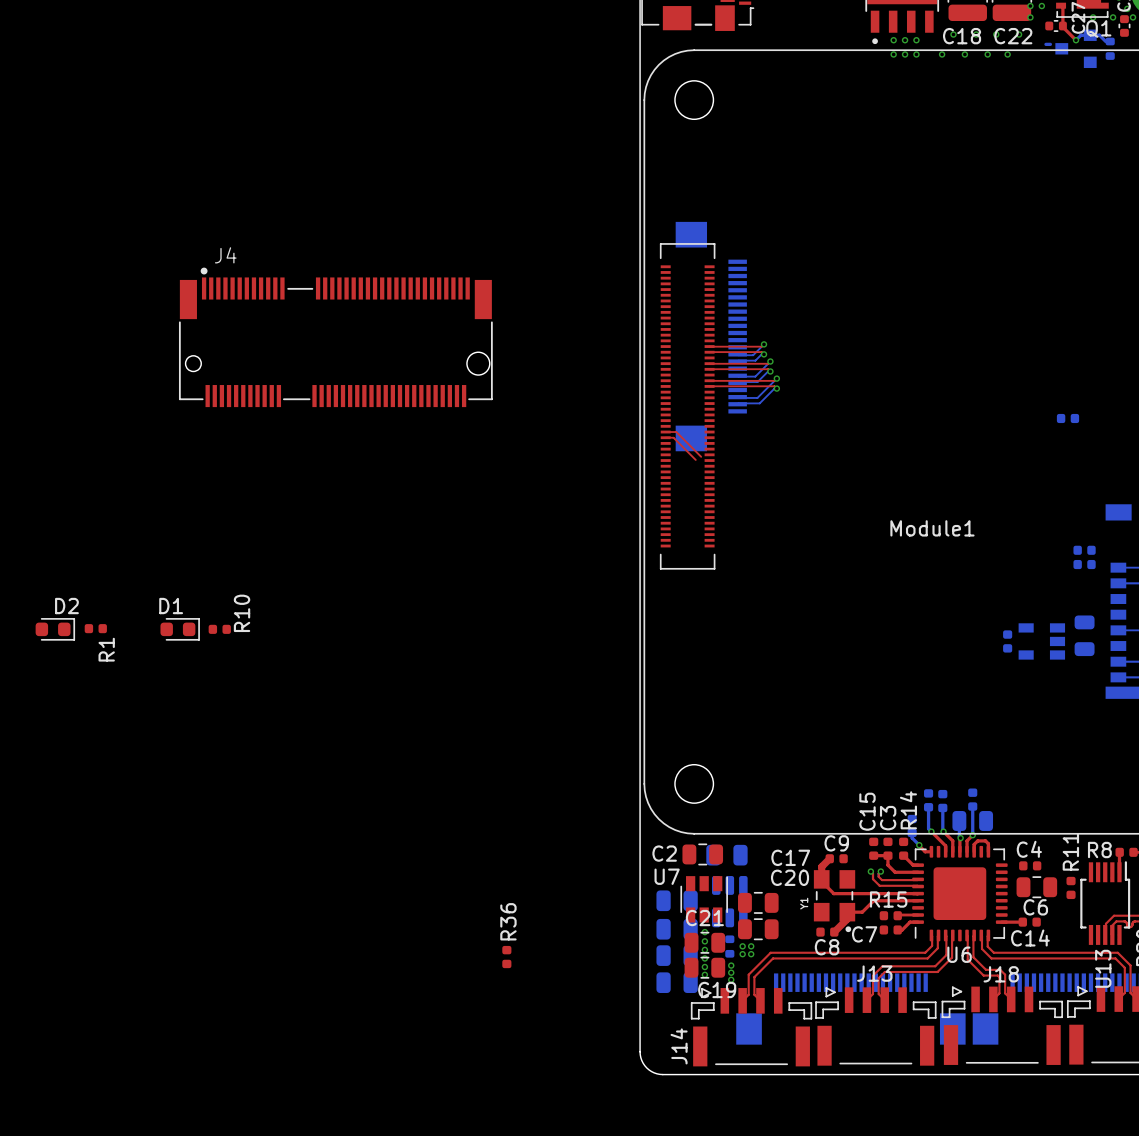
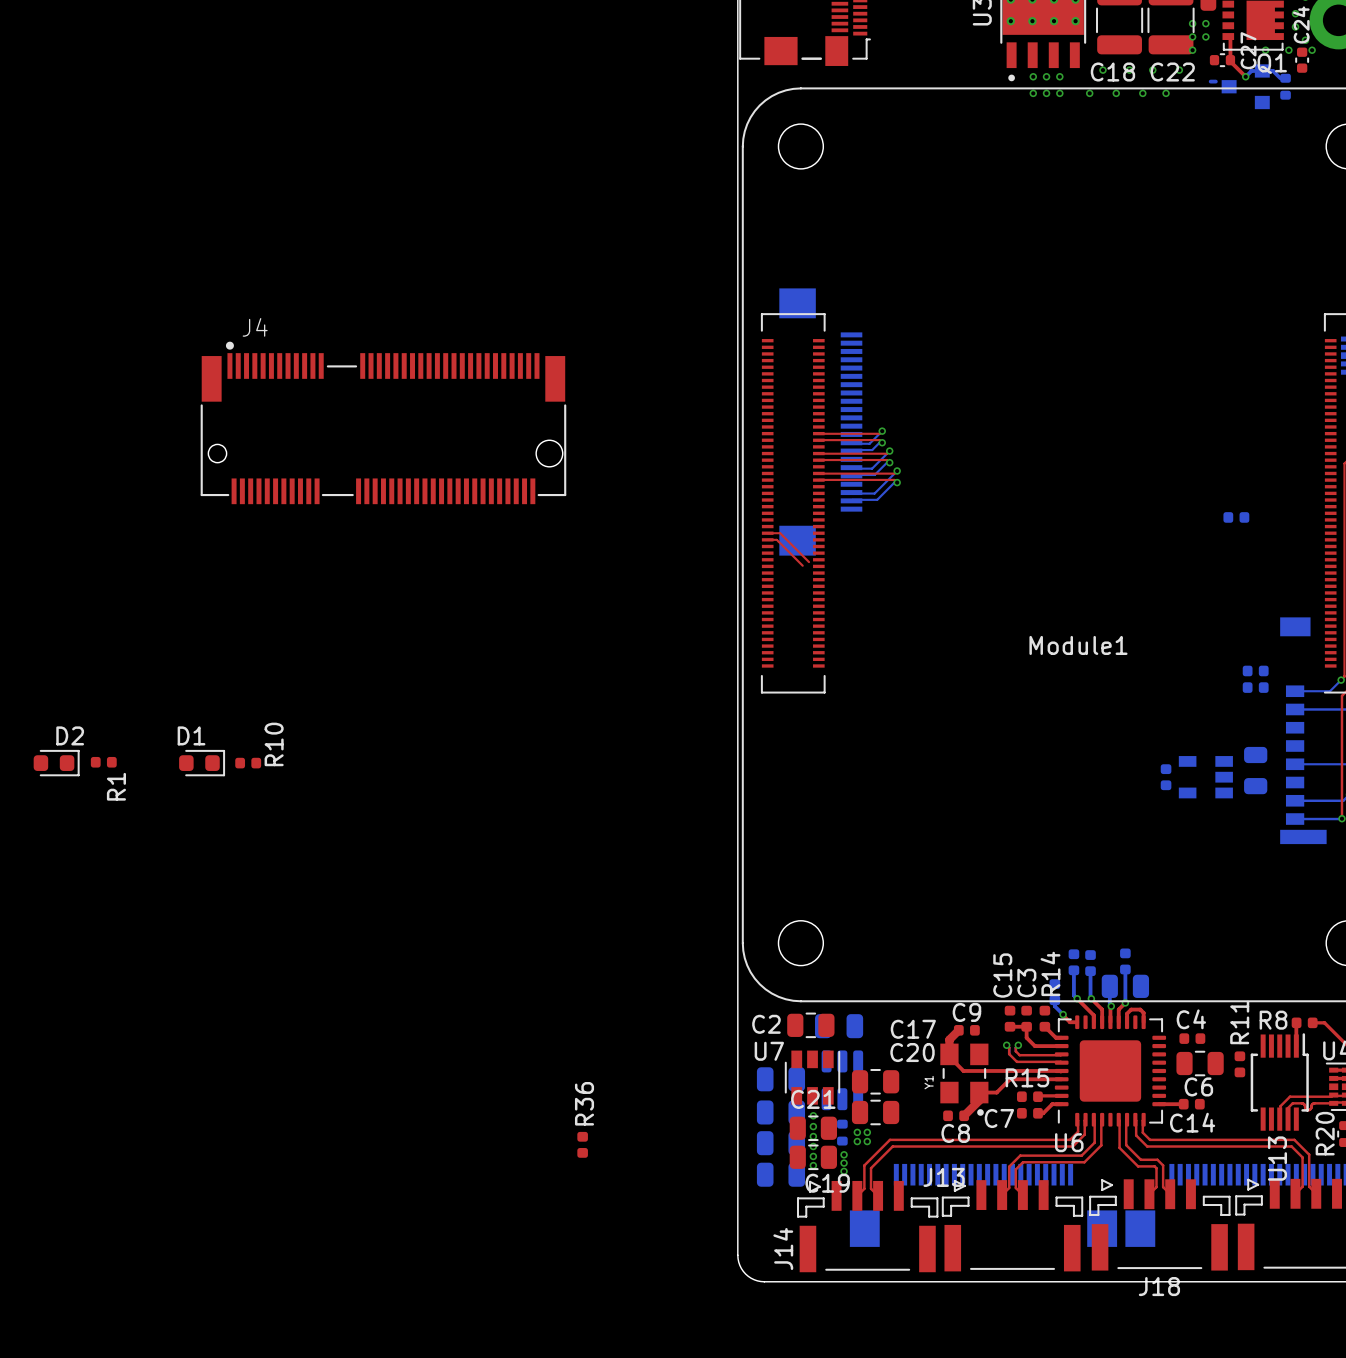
U6 name position: U6 (959, 954) -> U6 (1069, 1142)
J13 name position: J13 (874, 973) -> J13 (944, 1177)
J18 name position: J18 (1001, 974) -> J18 (1159, 1286)

